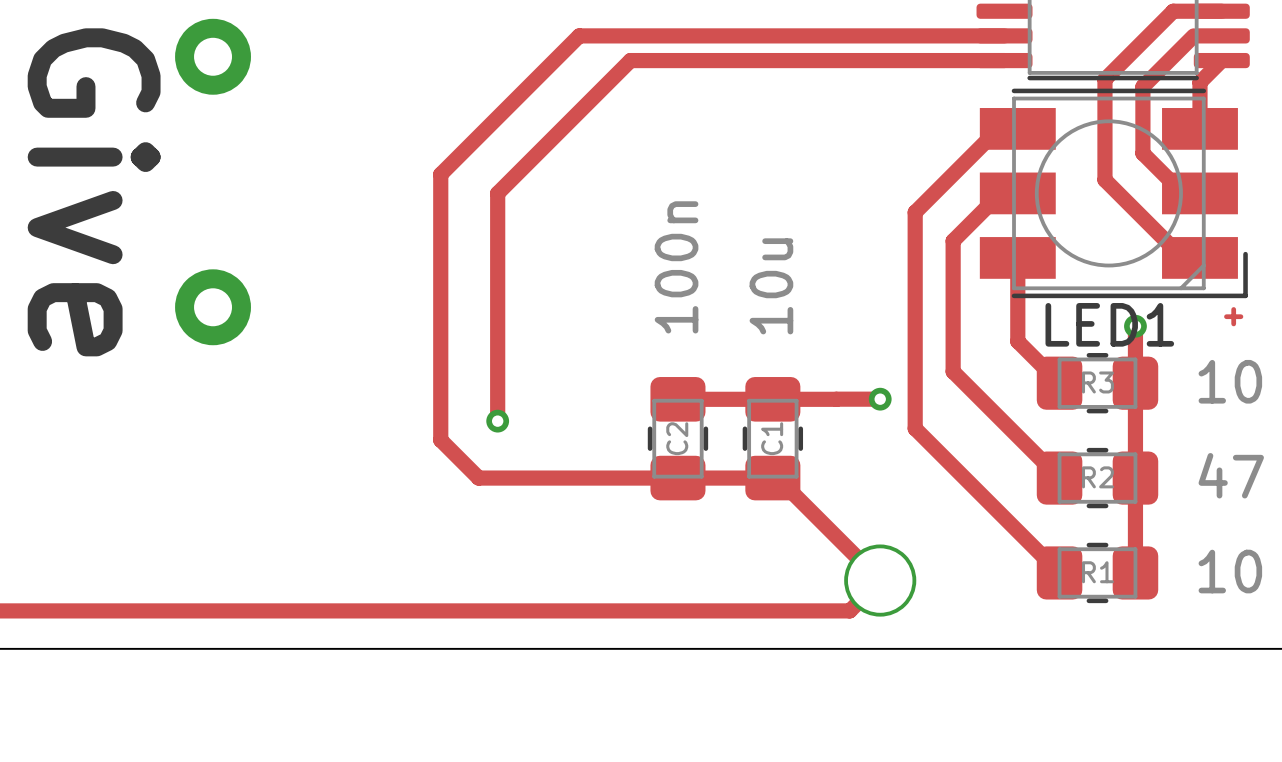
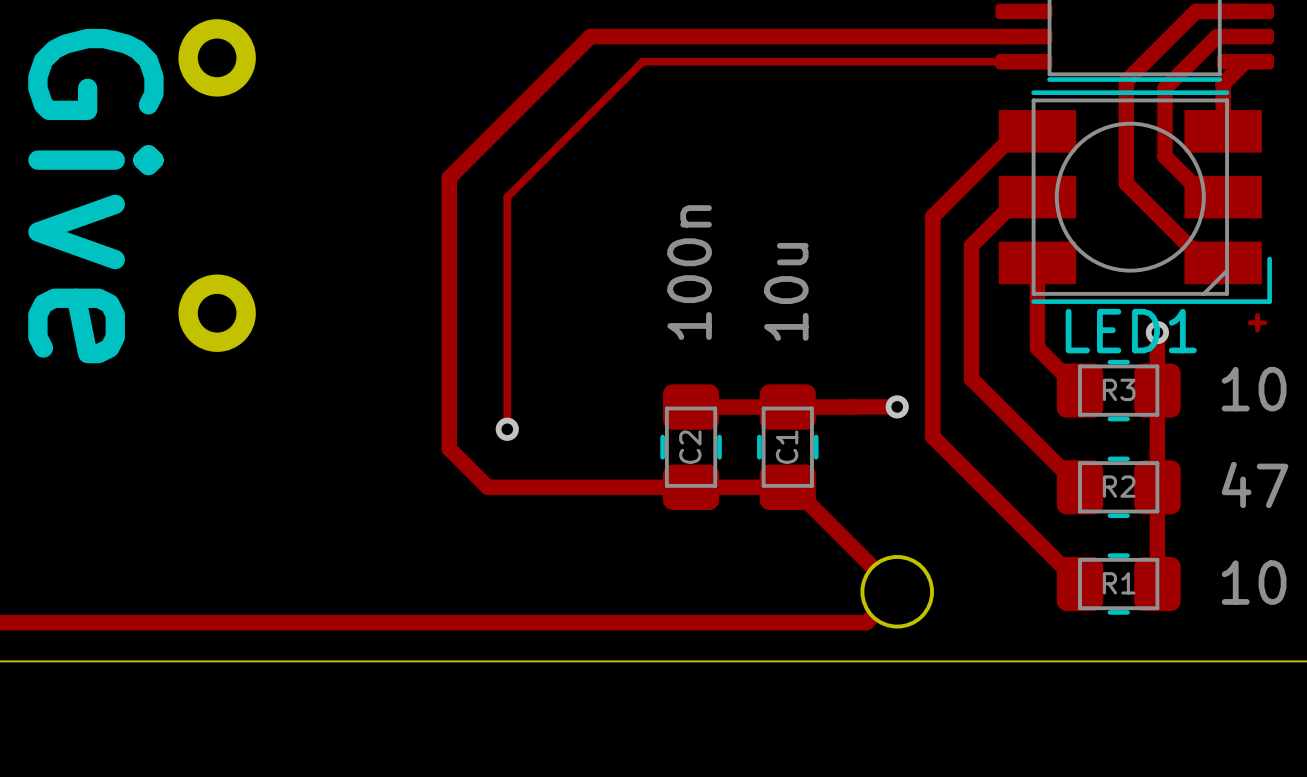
track width: thick (1004, 60) (630, 60) (497, 193) (497, 421) -> thin (1023, 61) (642, 61) (507, 197) (507, 429)

